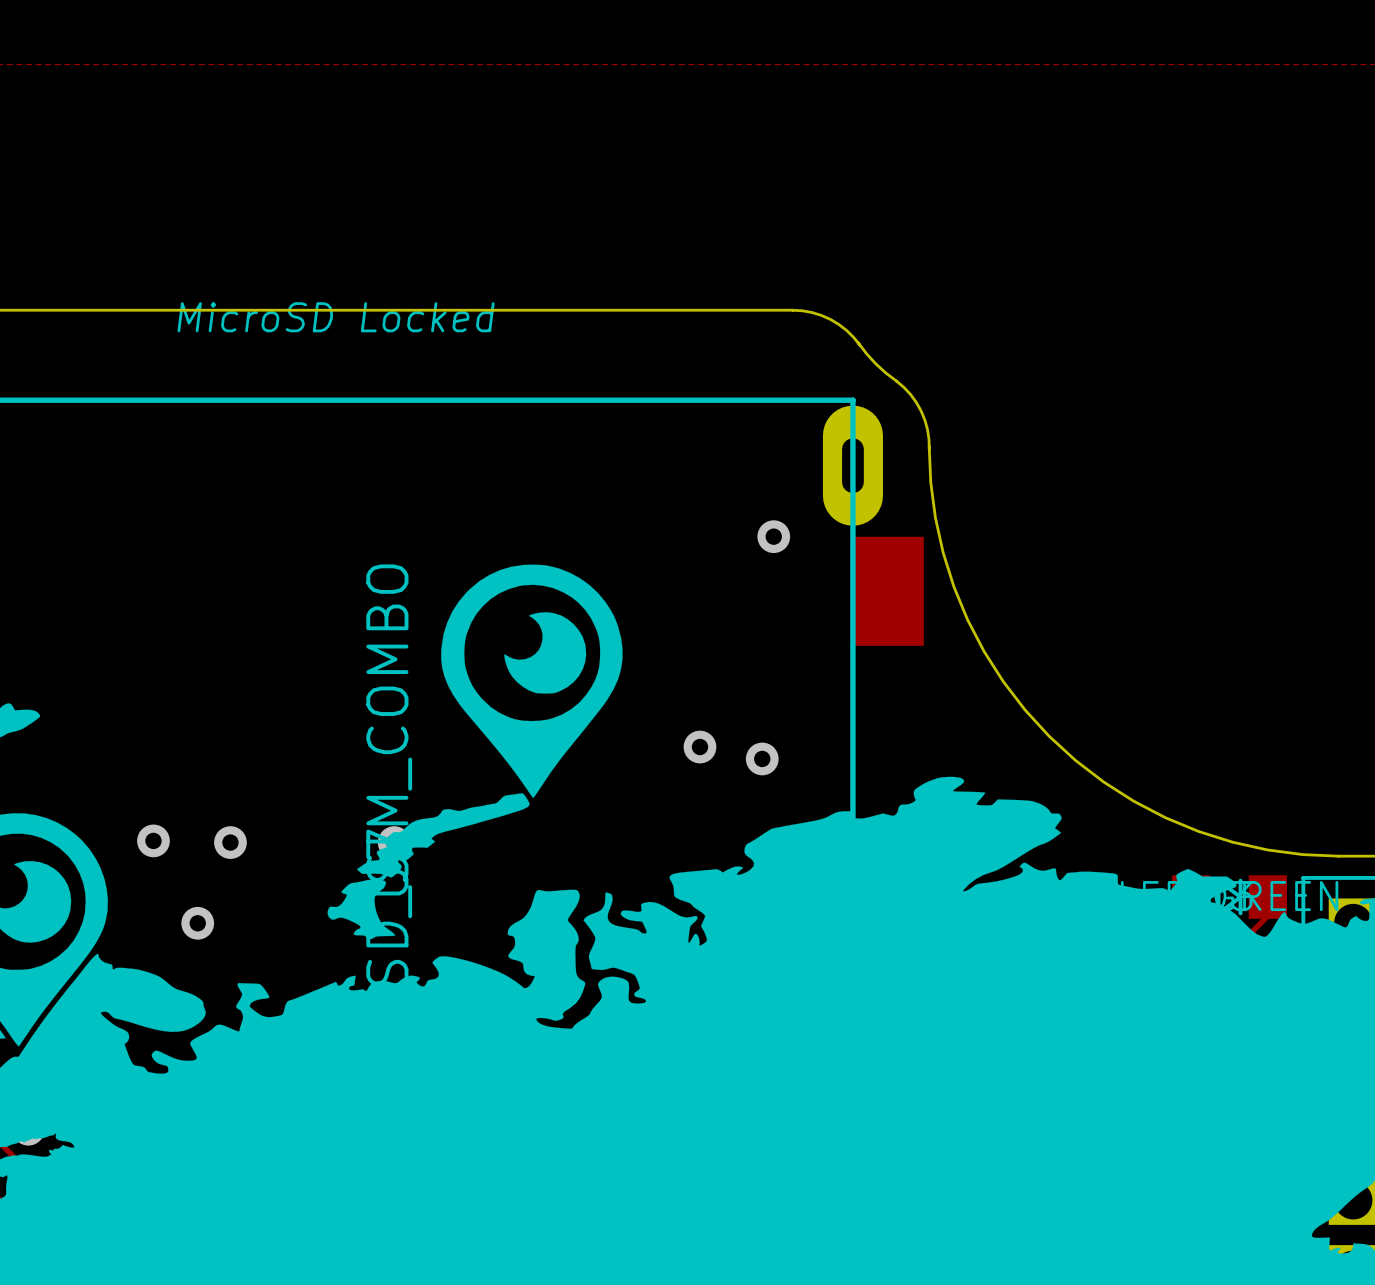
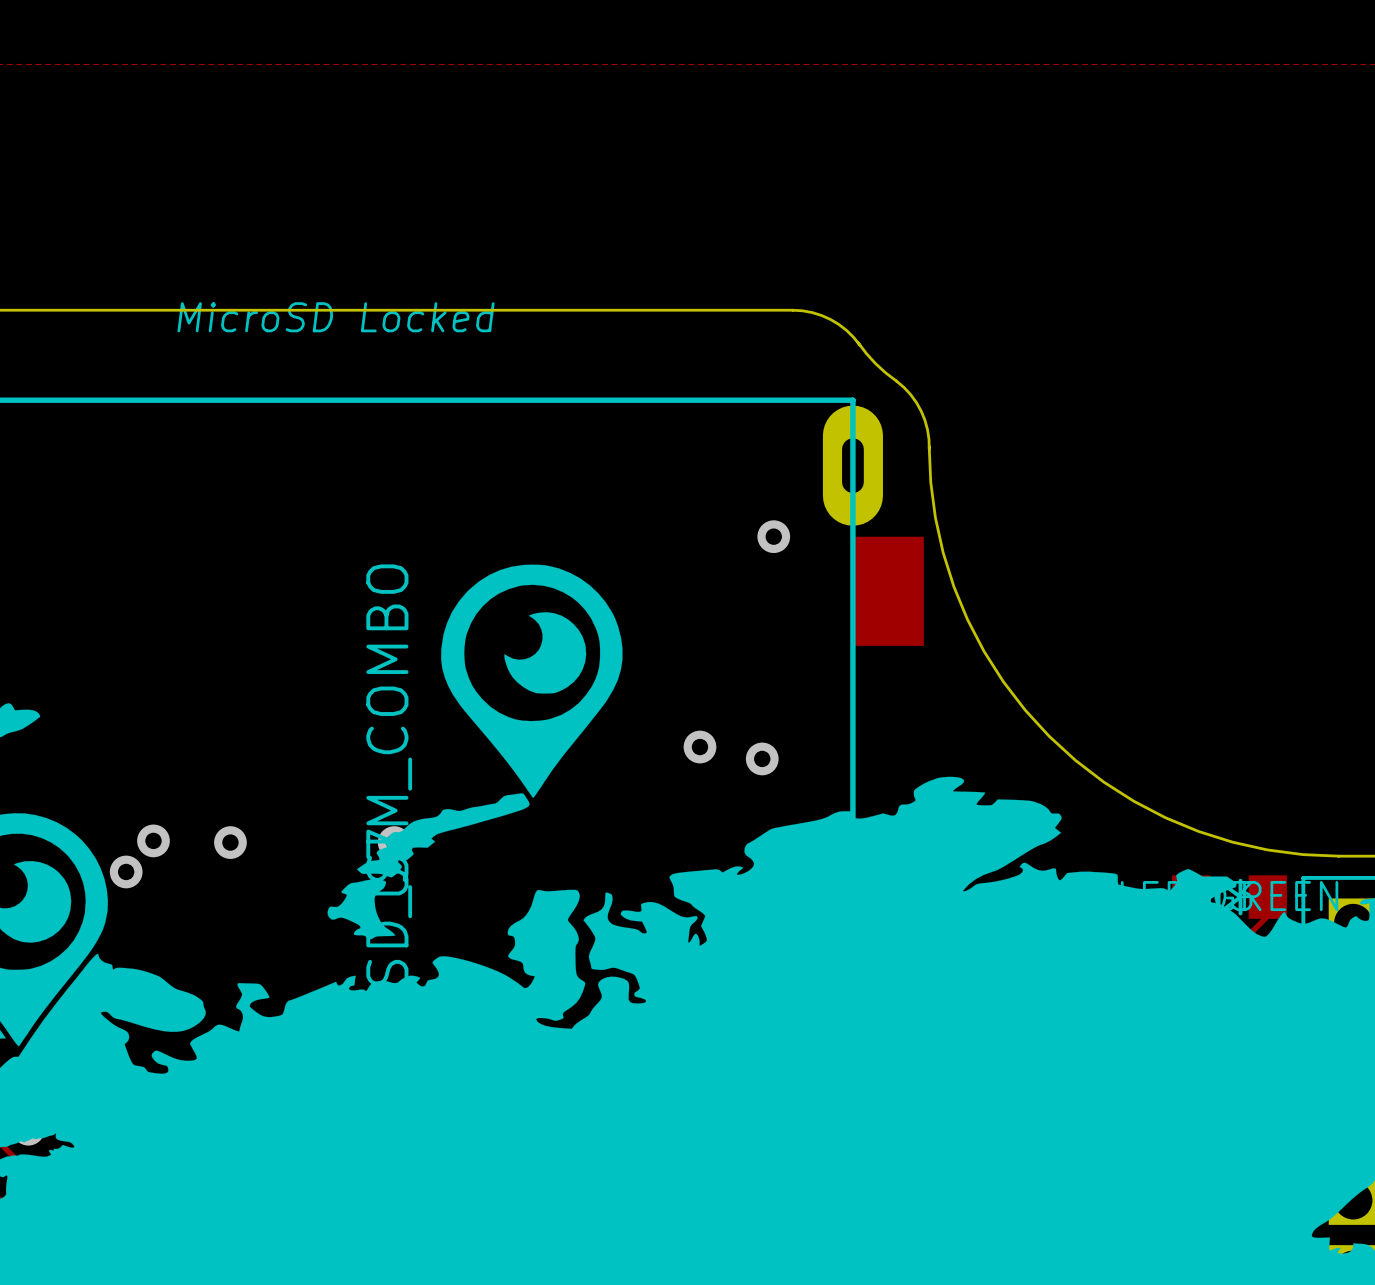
via position: (197, 923) -> (126, 871)

